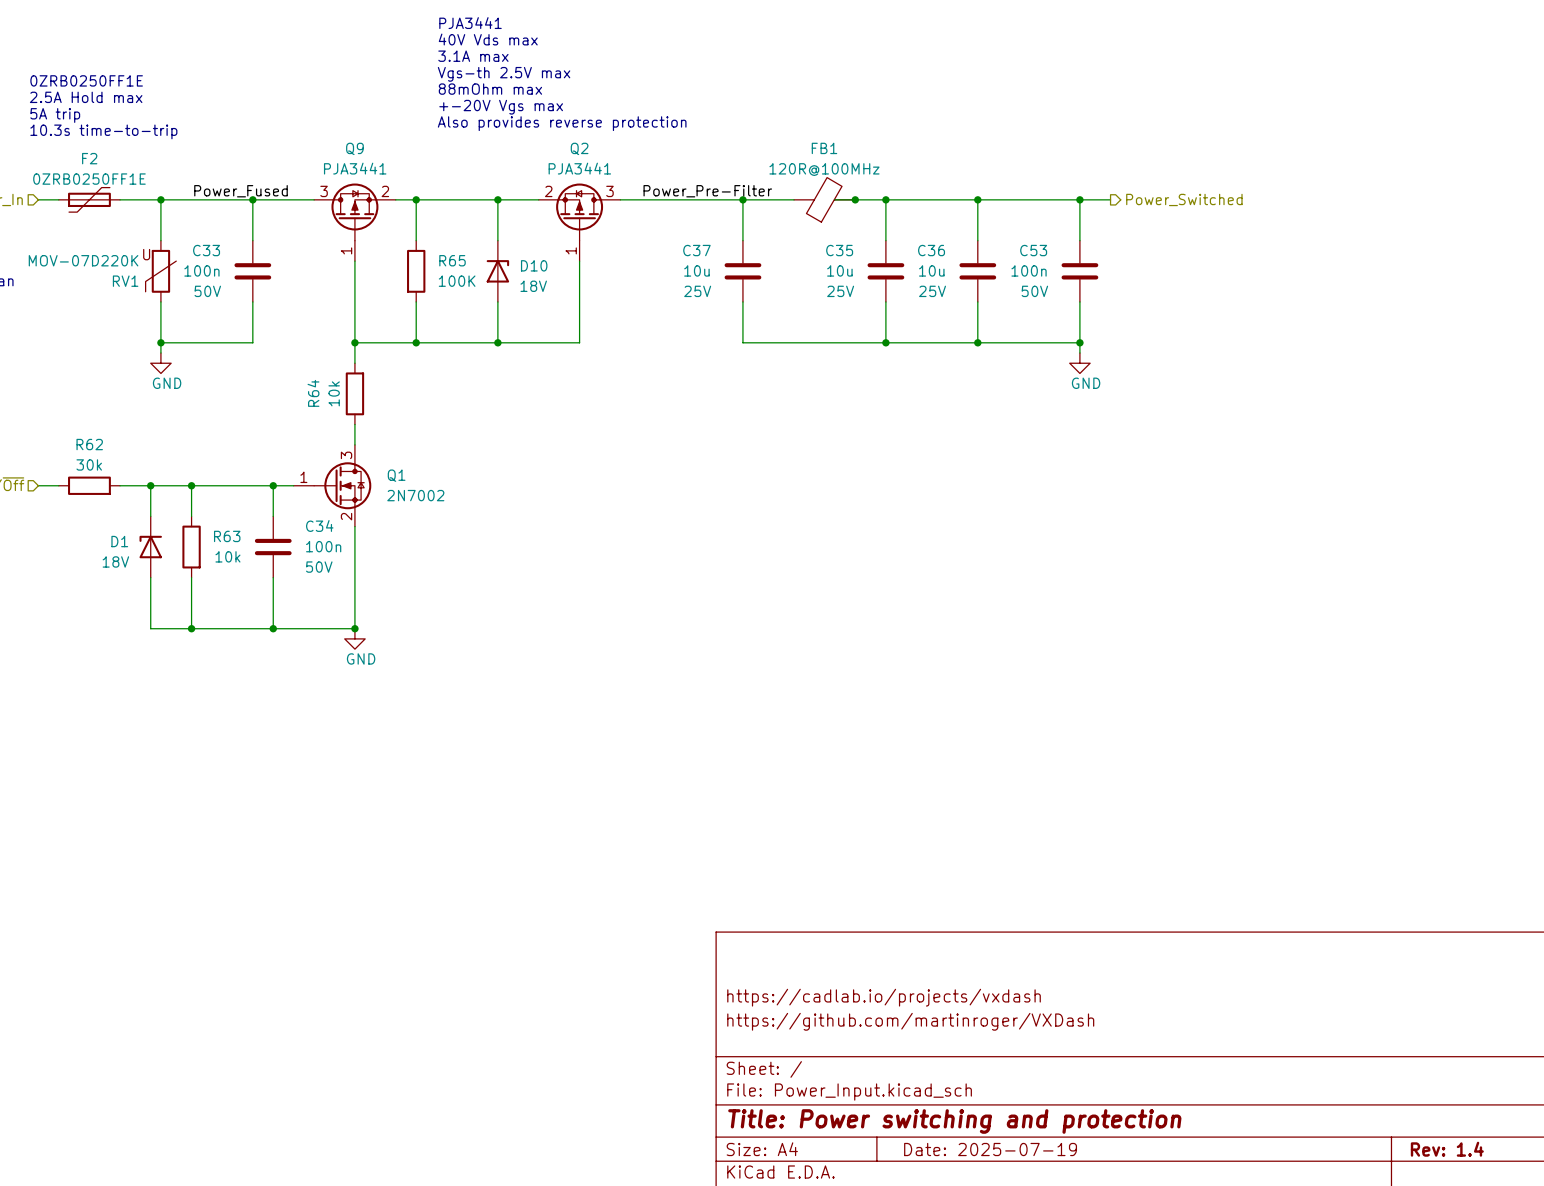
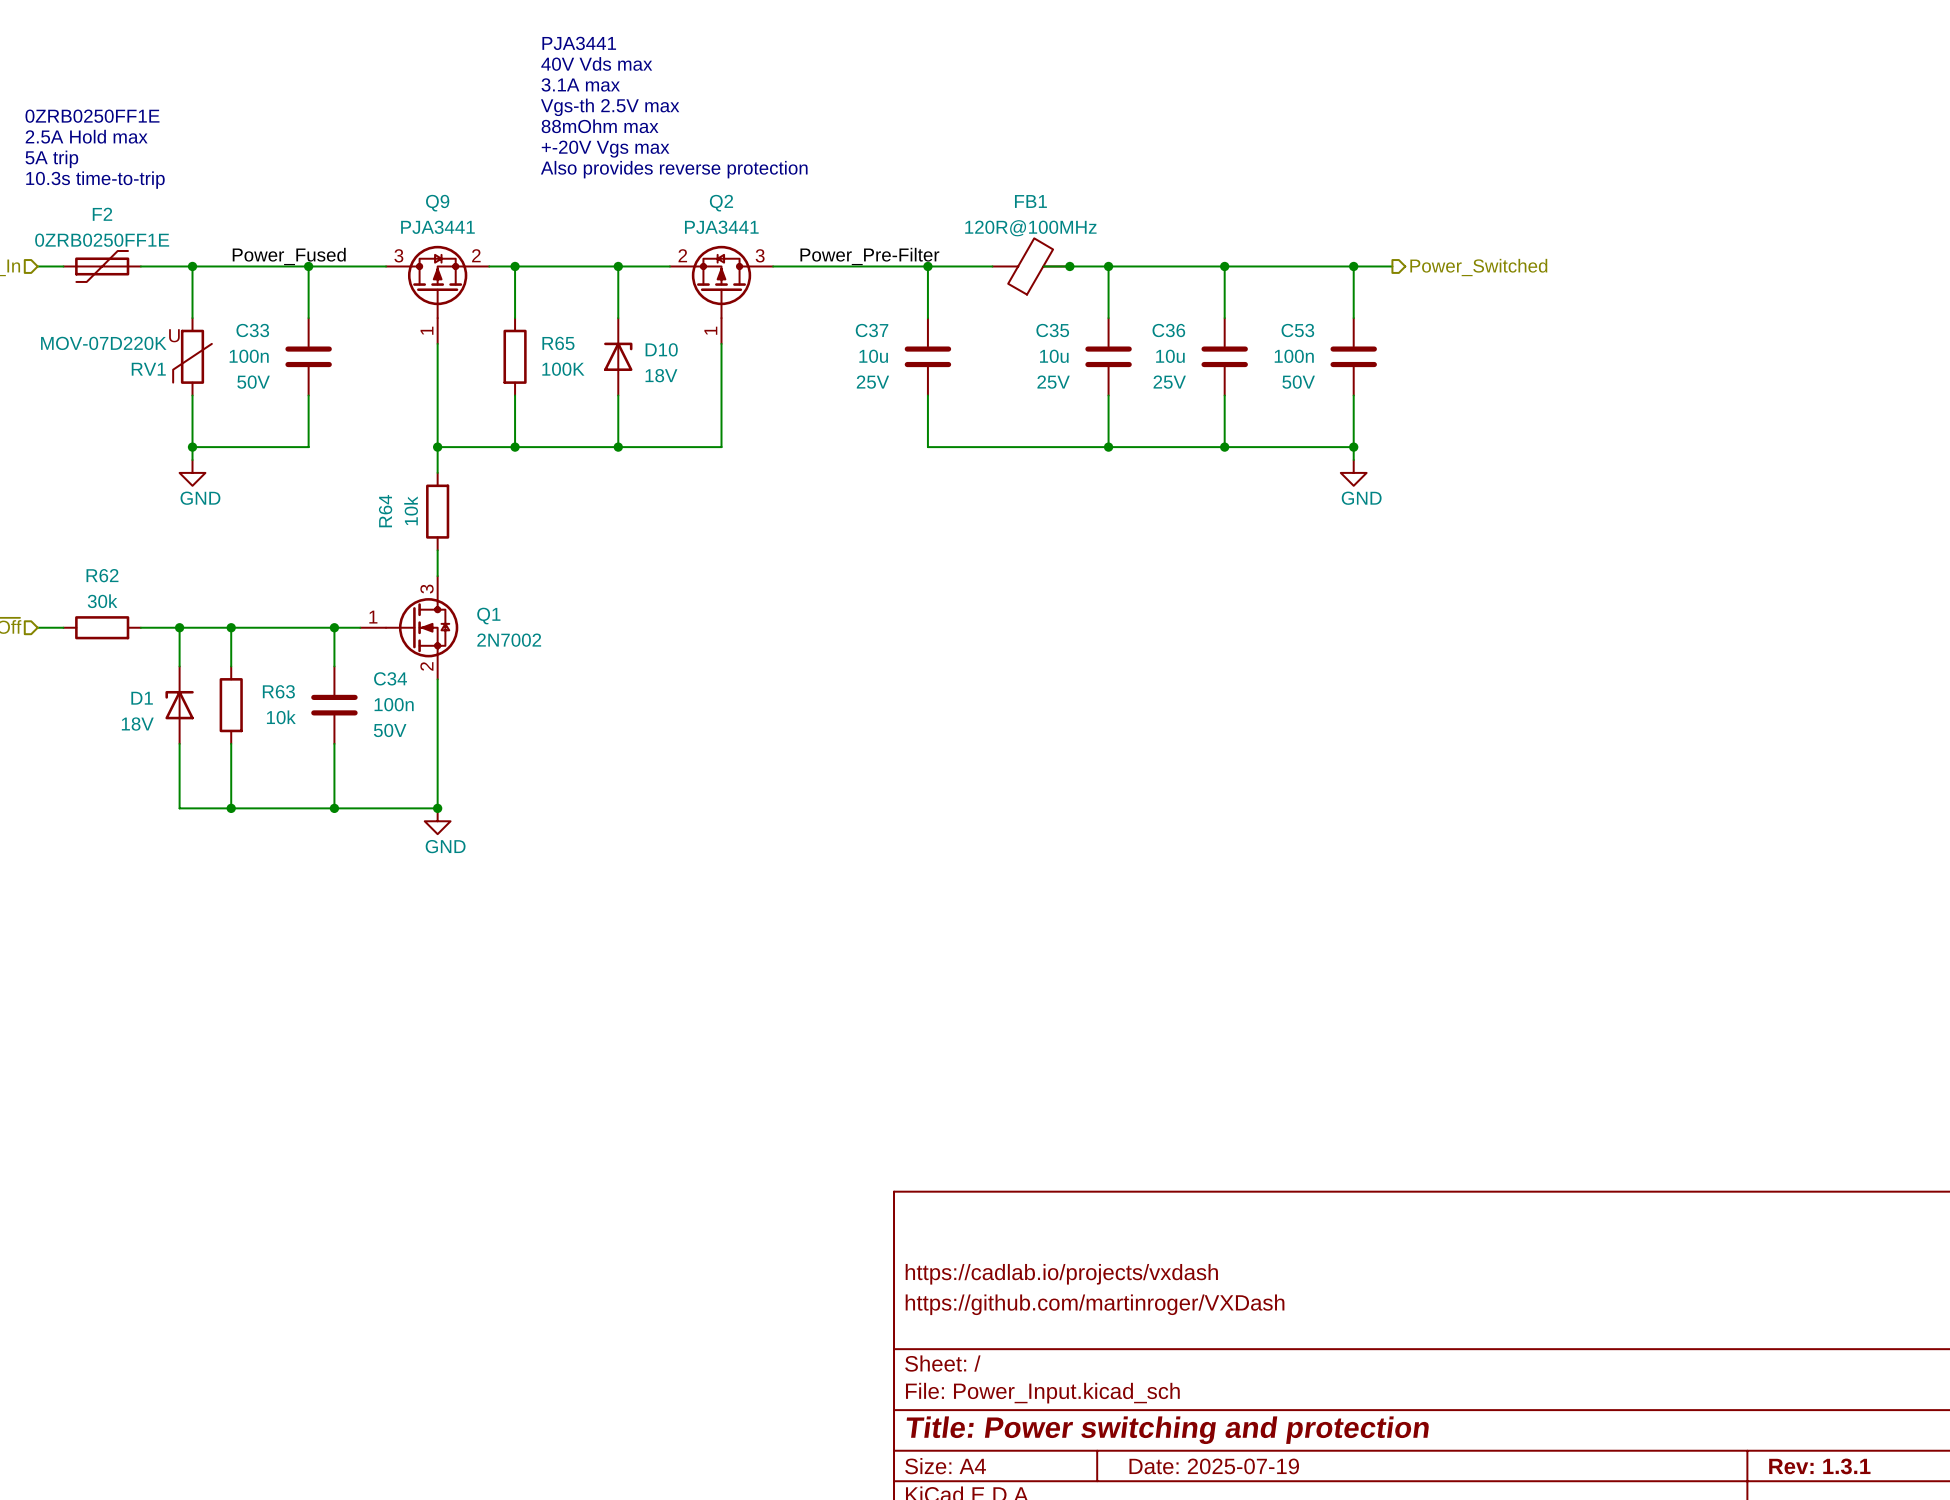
title block: Rev: 1.4 (1447, 1149) -> Rev: 1.3.1 (1819, 1466)

